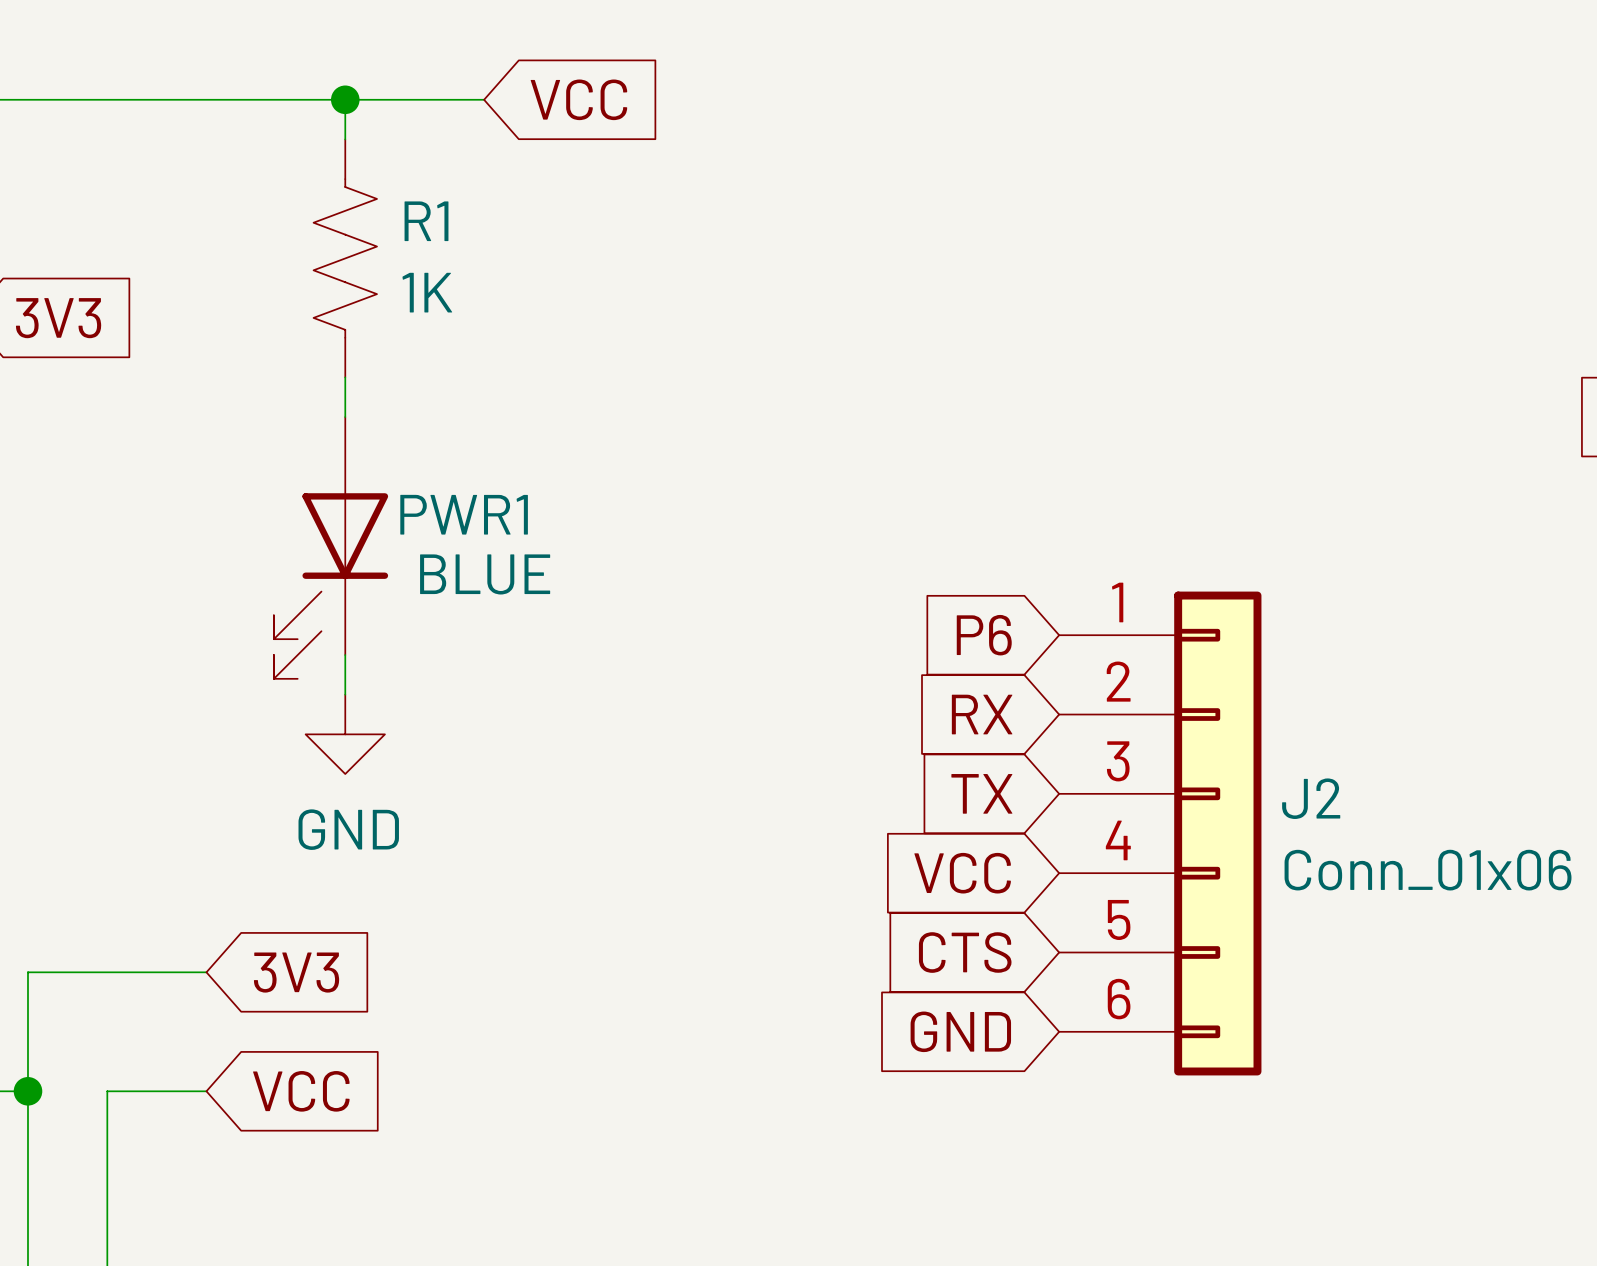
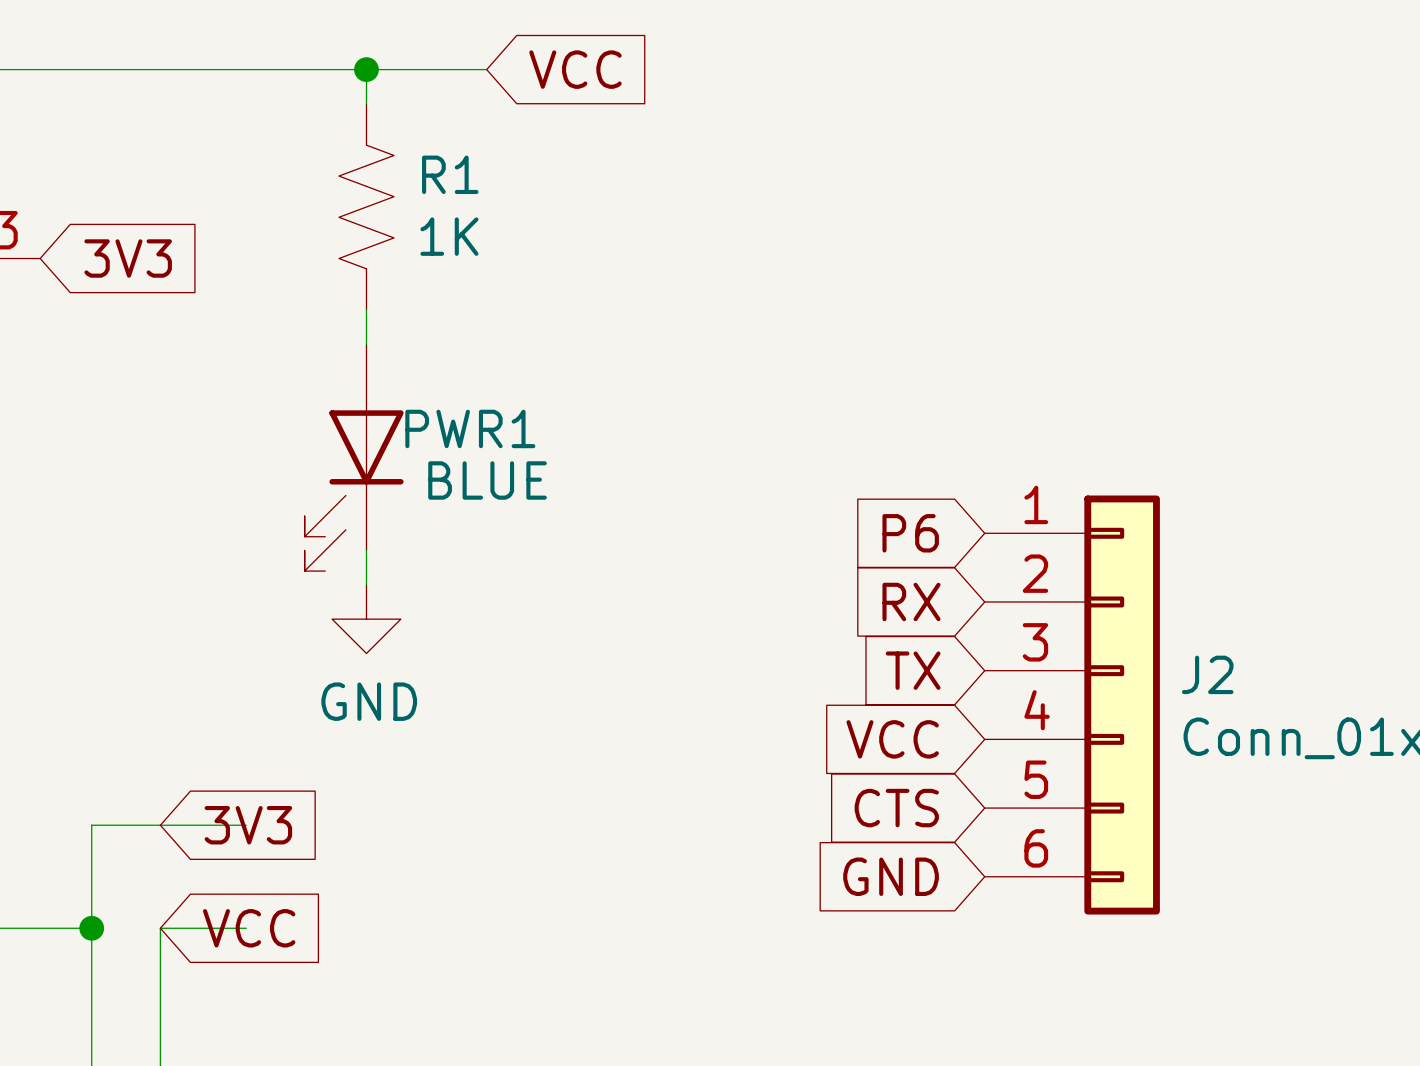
global label position: 3V3 (296, 972) -> 3V3 (248, 825)
global label position: VCC (301, 1091) -> VCC (249, 928)

